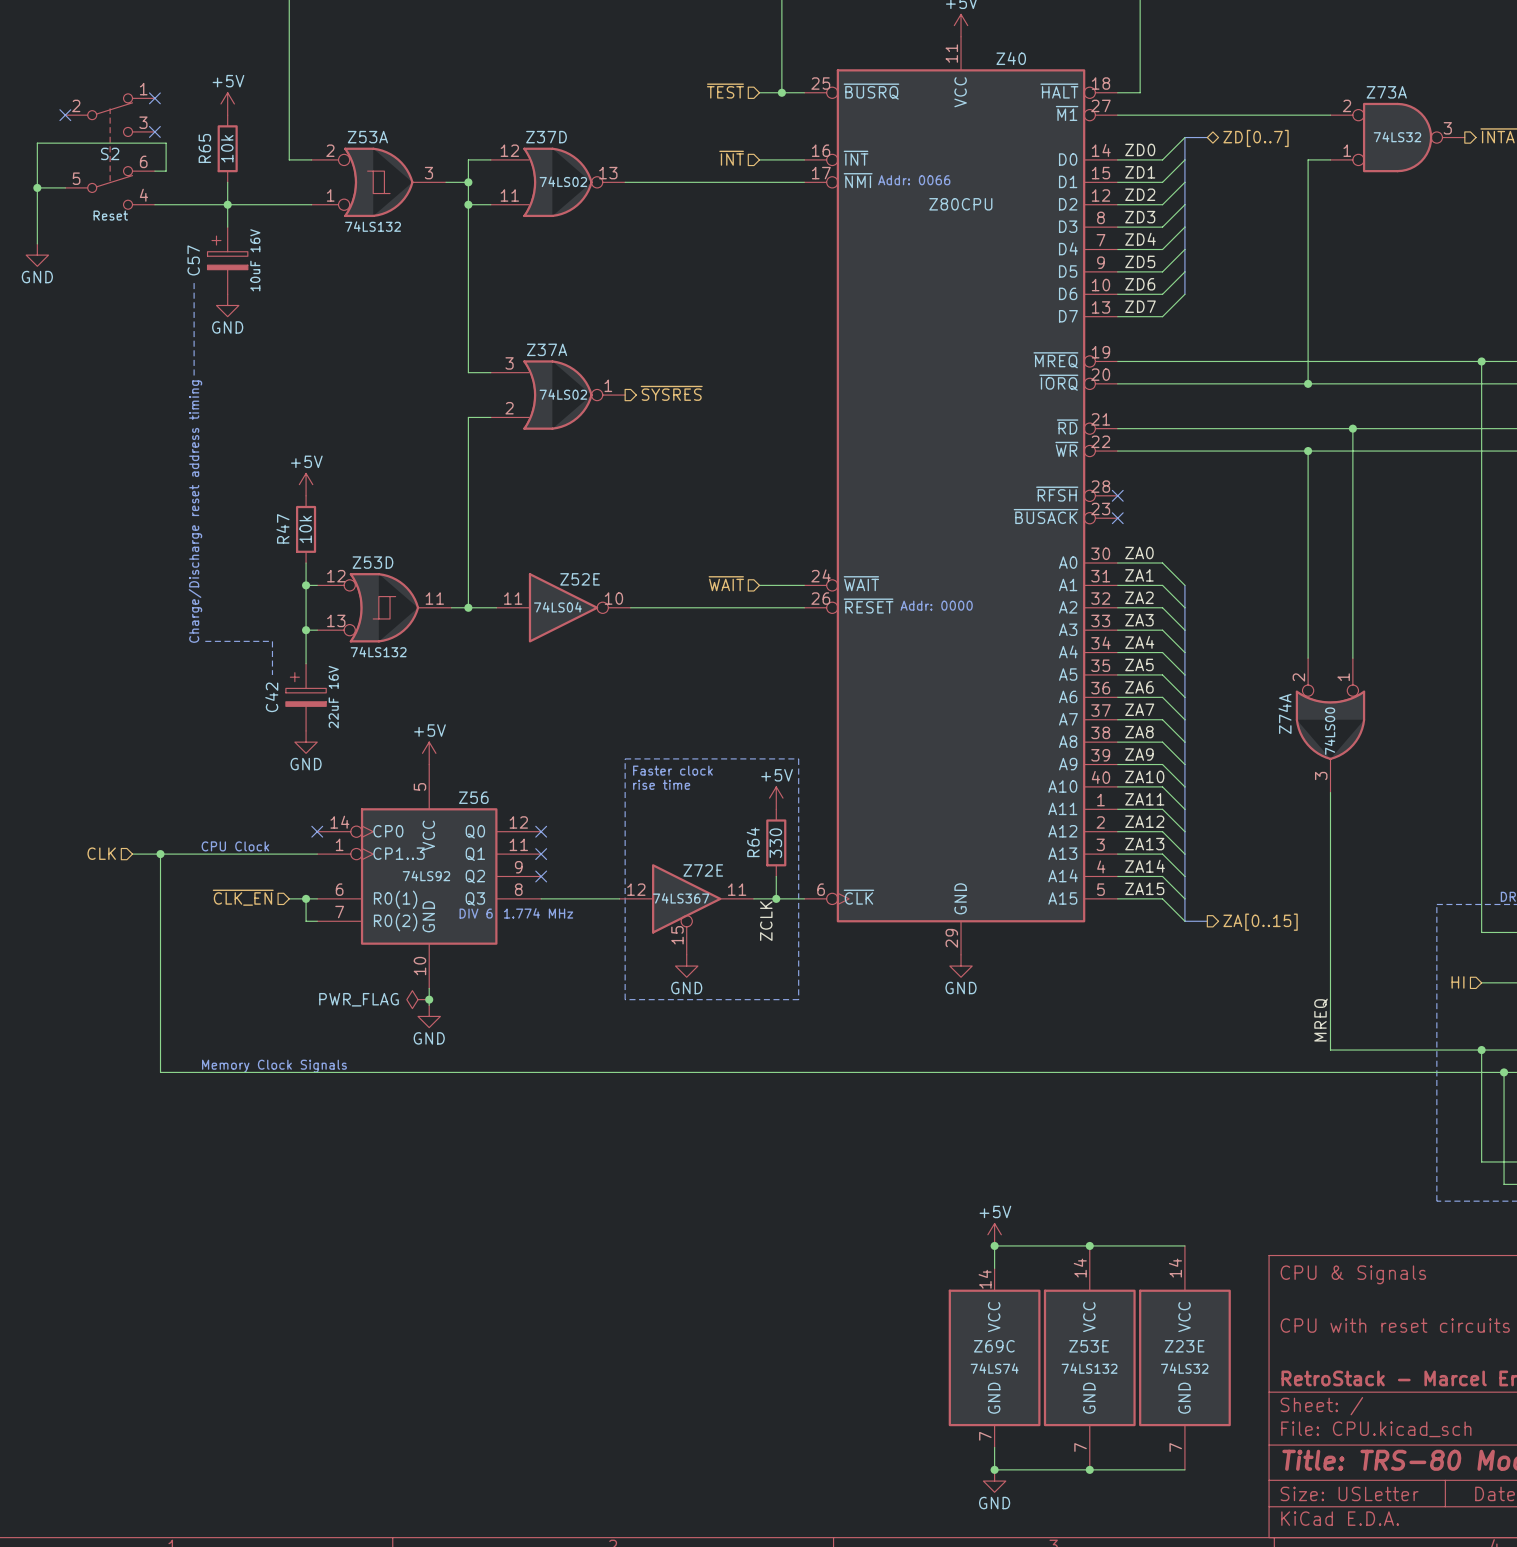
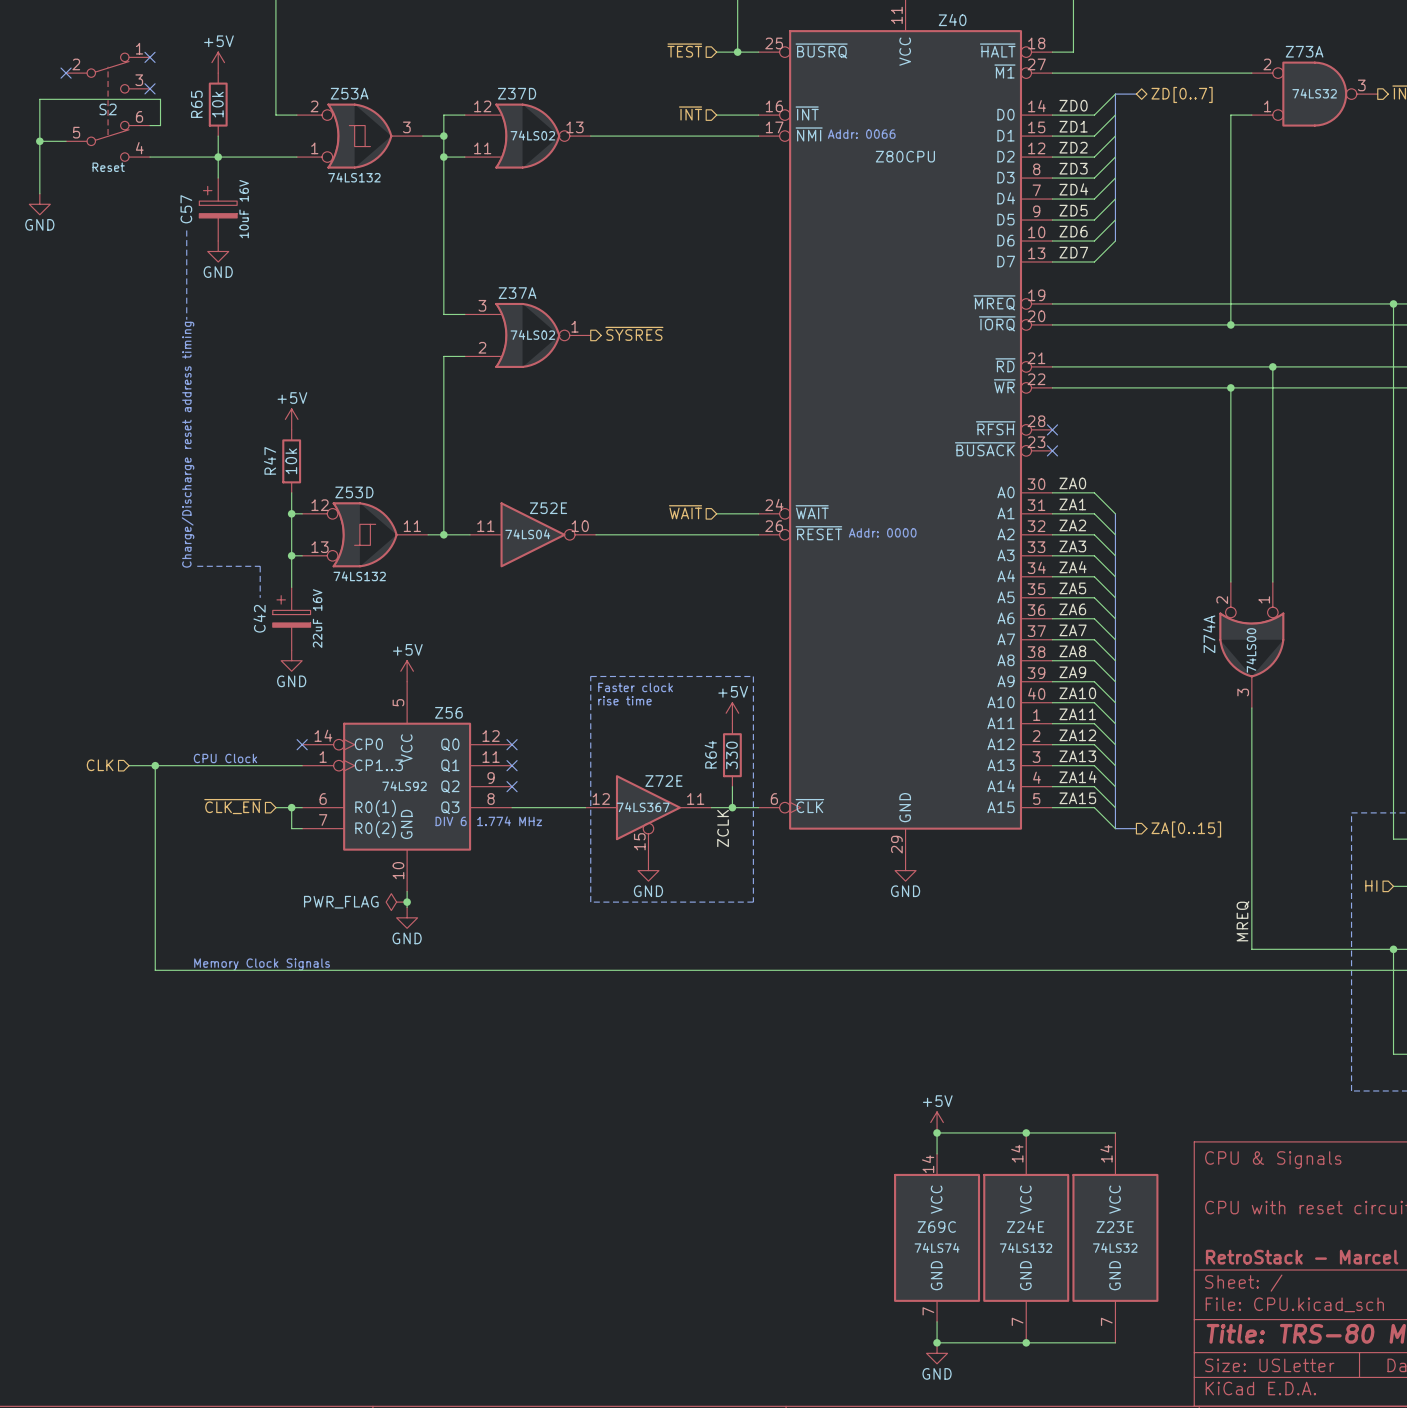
Z53E name: Z53E (1089, 1346) -> Z24E (1025, 1226)

